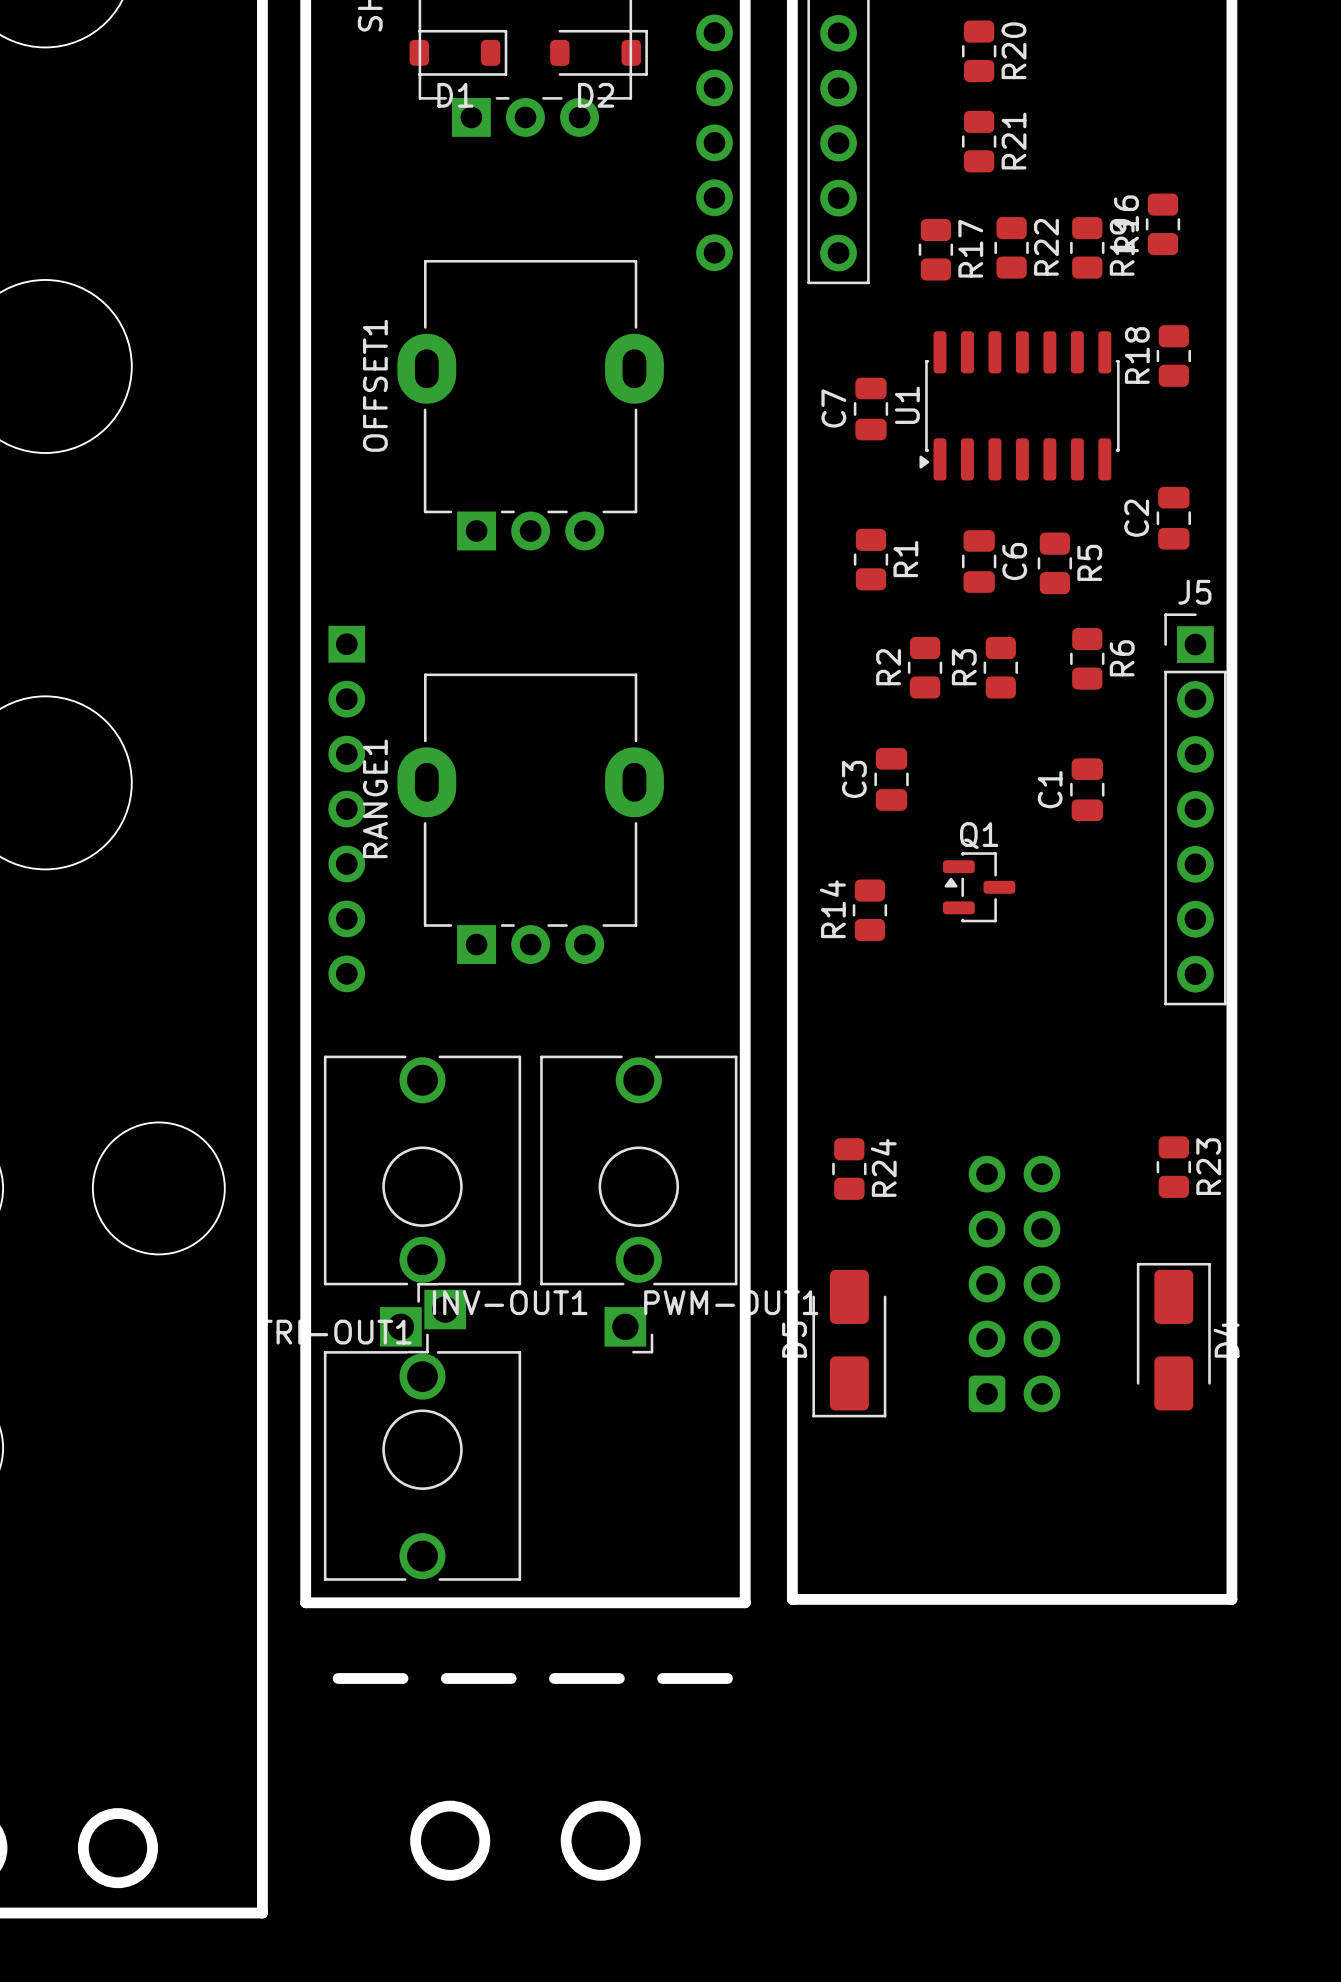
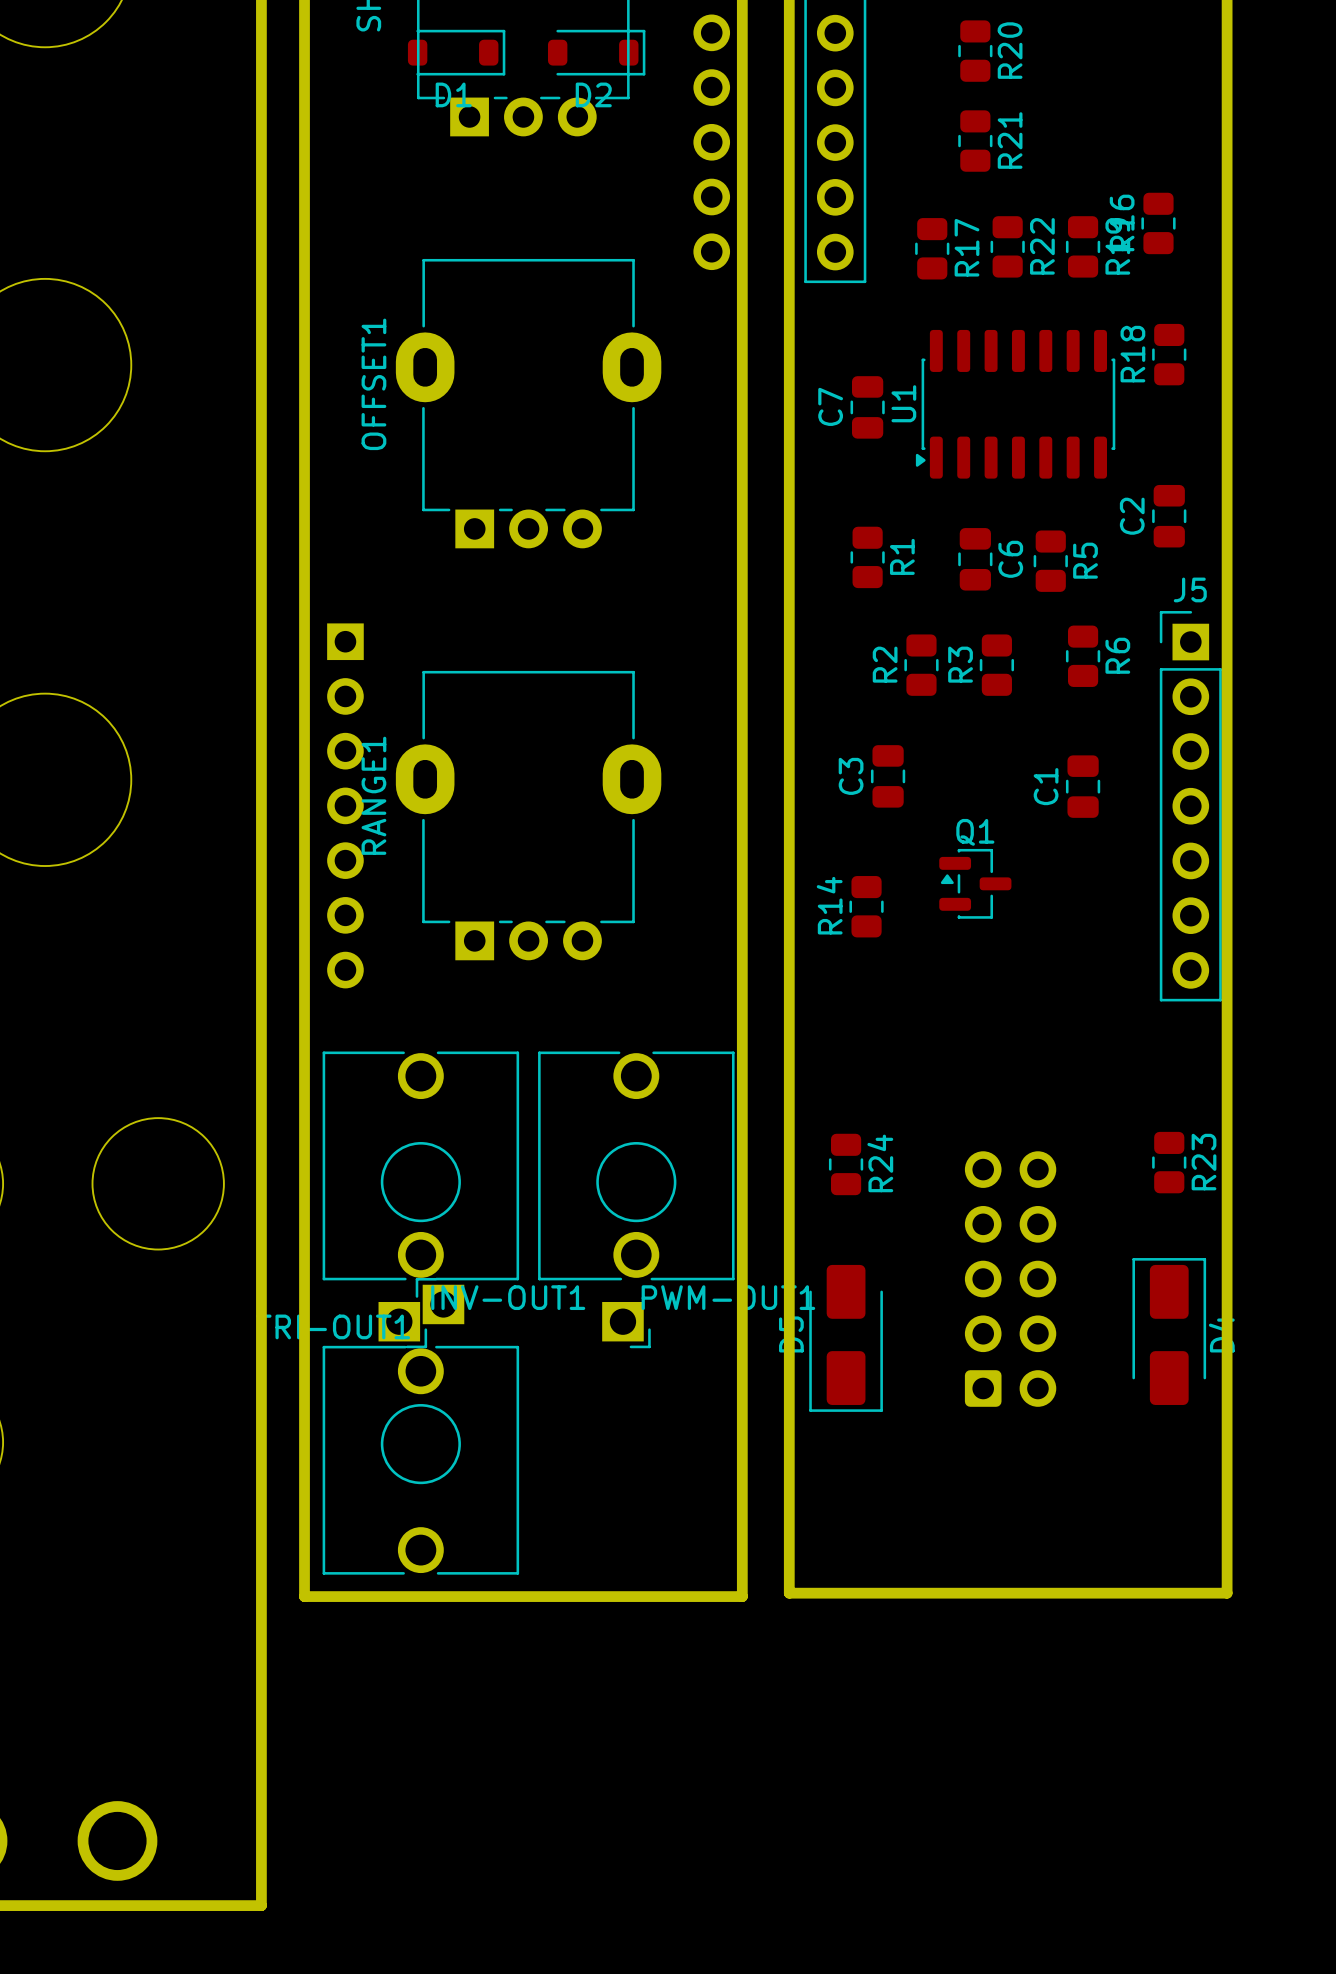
board edge: (338, 1678) (403, 1678) -> none
board edge: (446, 1678) (511, 1678) -> none
board edge: (554, 1678) (619, 1678) -> none
board edge: (662, 1678) (727, 1678) -> none
round board edge: [410, 1800, 491, 1881] -> none
round board edge: [560, 1800, 641, 1881] -> none

